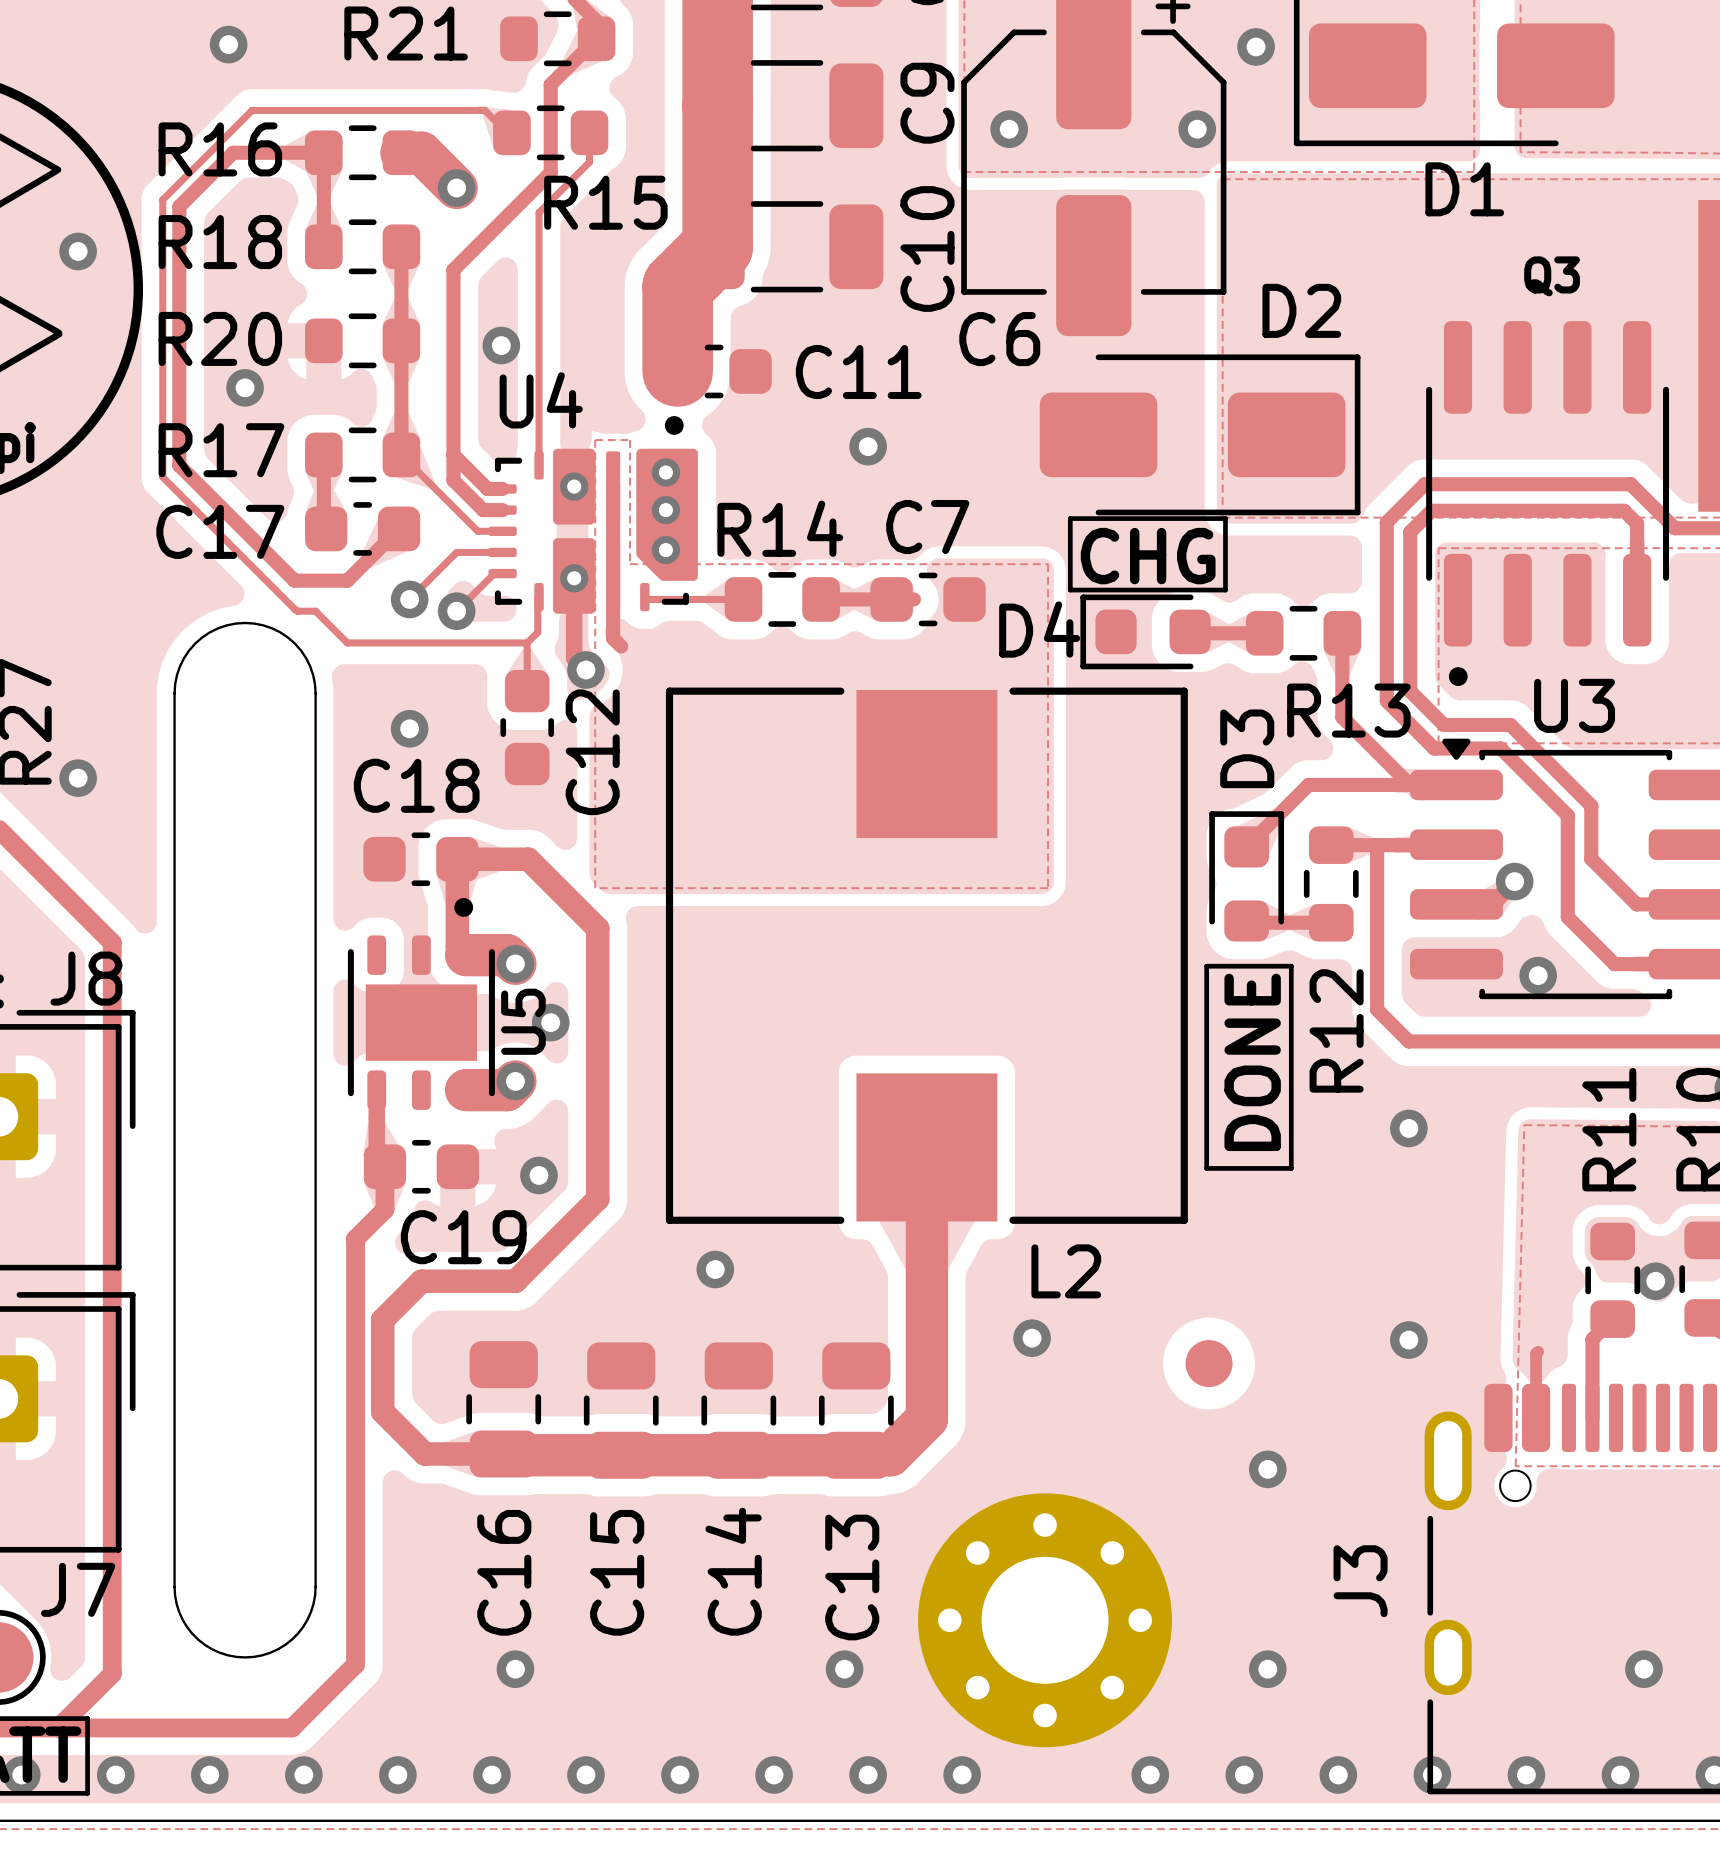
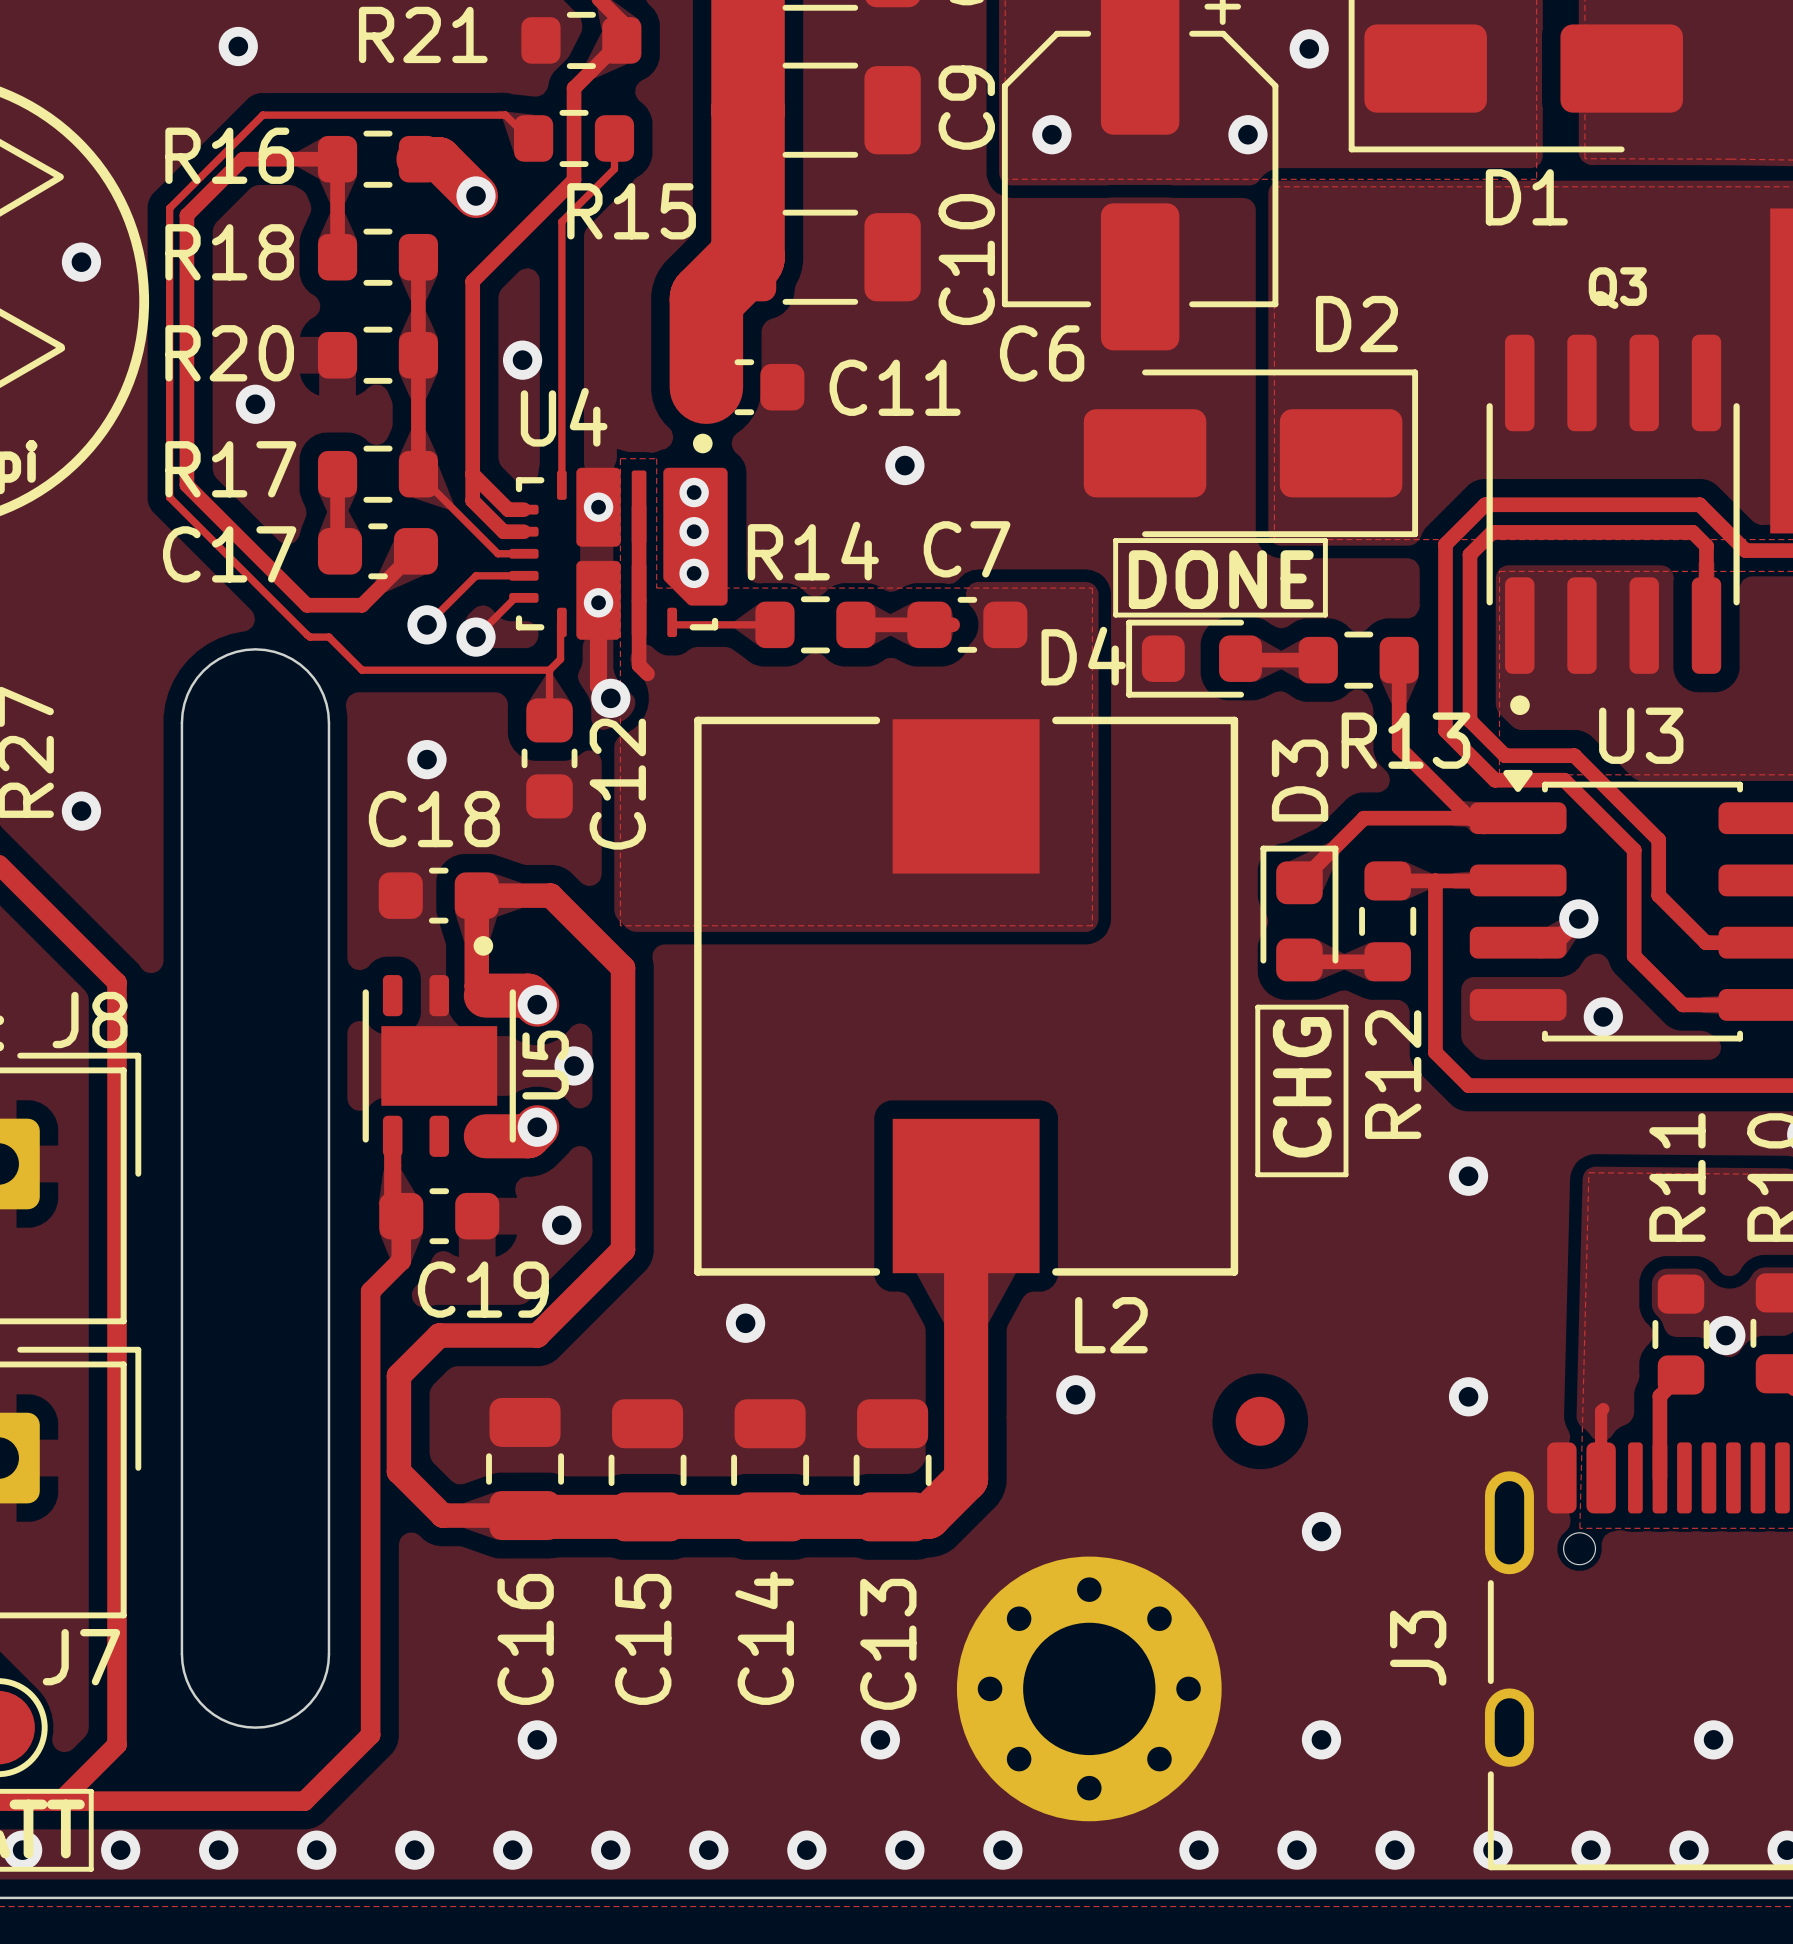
line: (1225, 518) (1225, 590) -> (1277, 540) (1325, 540) (1325, 615) (1277, 615)
text: CHG (1148, 556) -> DONE (1221, 579)
text: DONE (1252, 1062) -> CHG (1302, 1087)
line: (1206, 1127) (1206, 1168) (1291, 1168) (1291, 1127) -> (1257, 1174) (1345, 1174)

